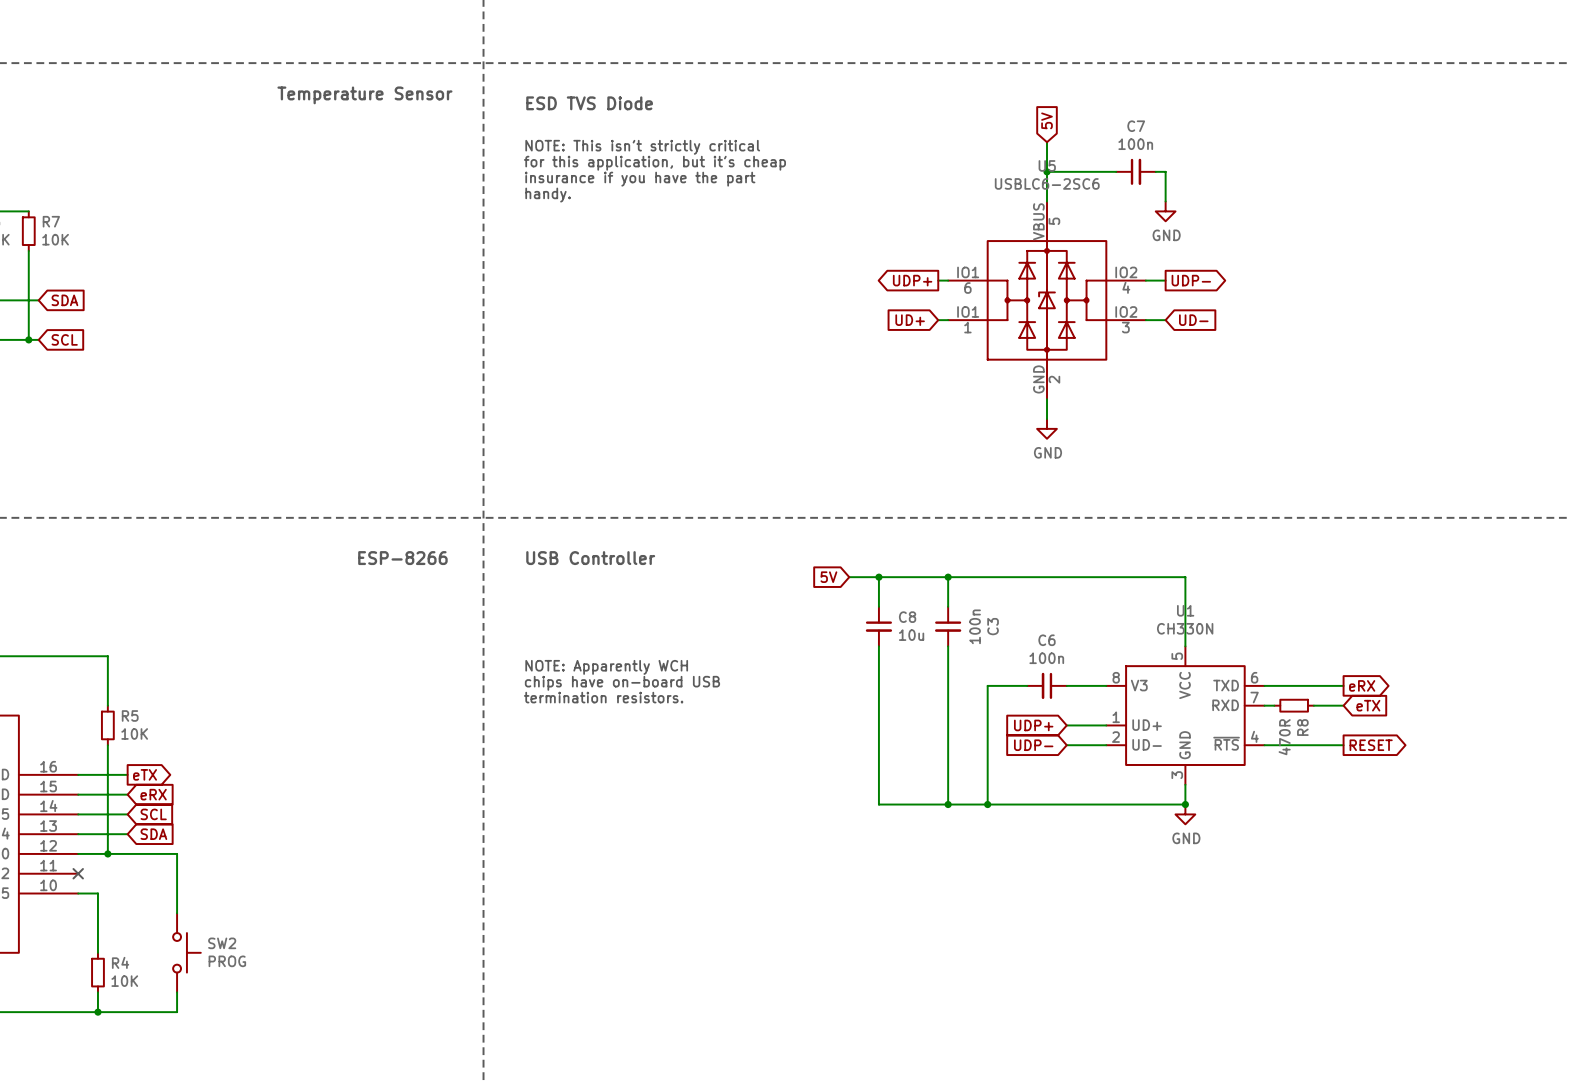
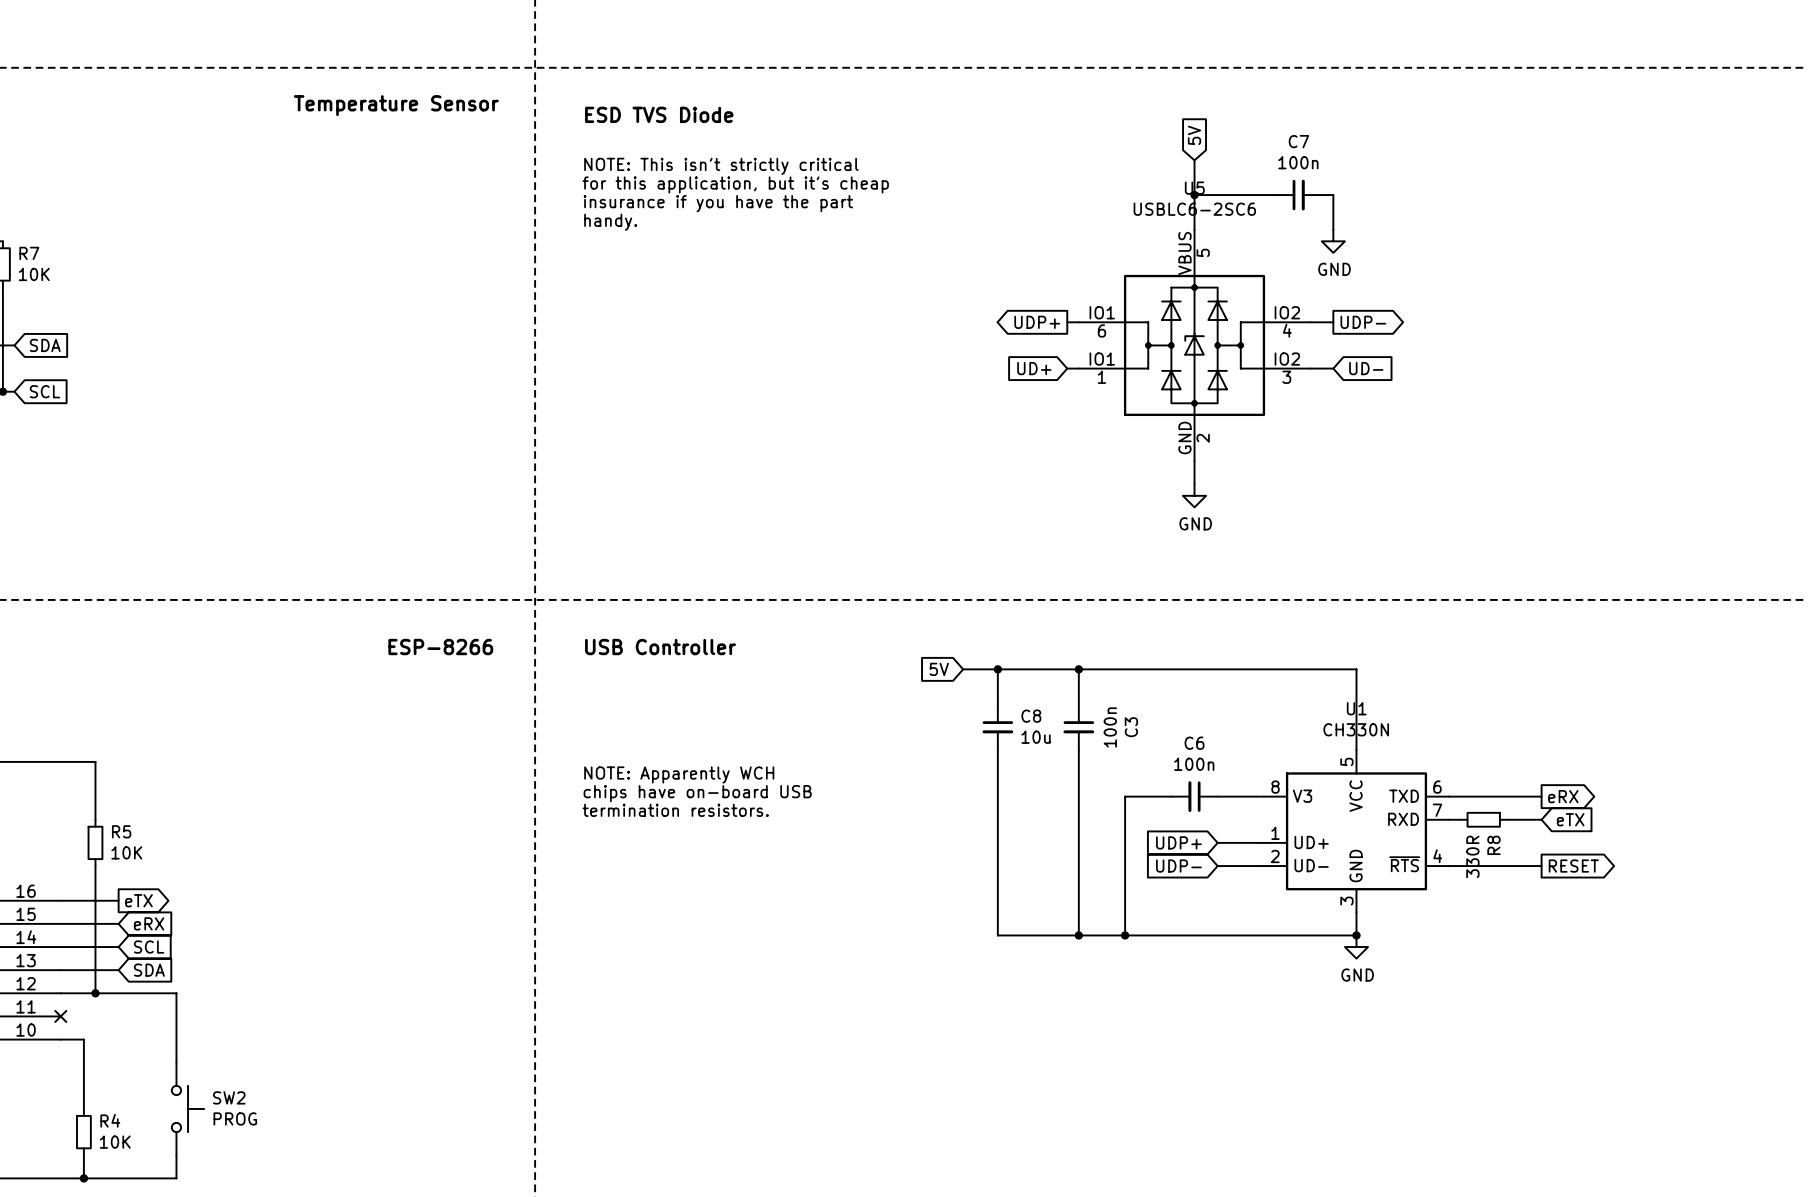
R8 value: 470R (1284, 737) -> 330R (1472, 856)

